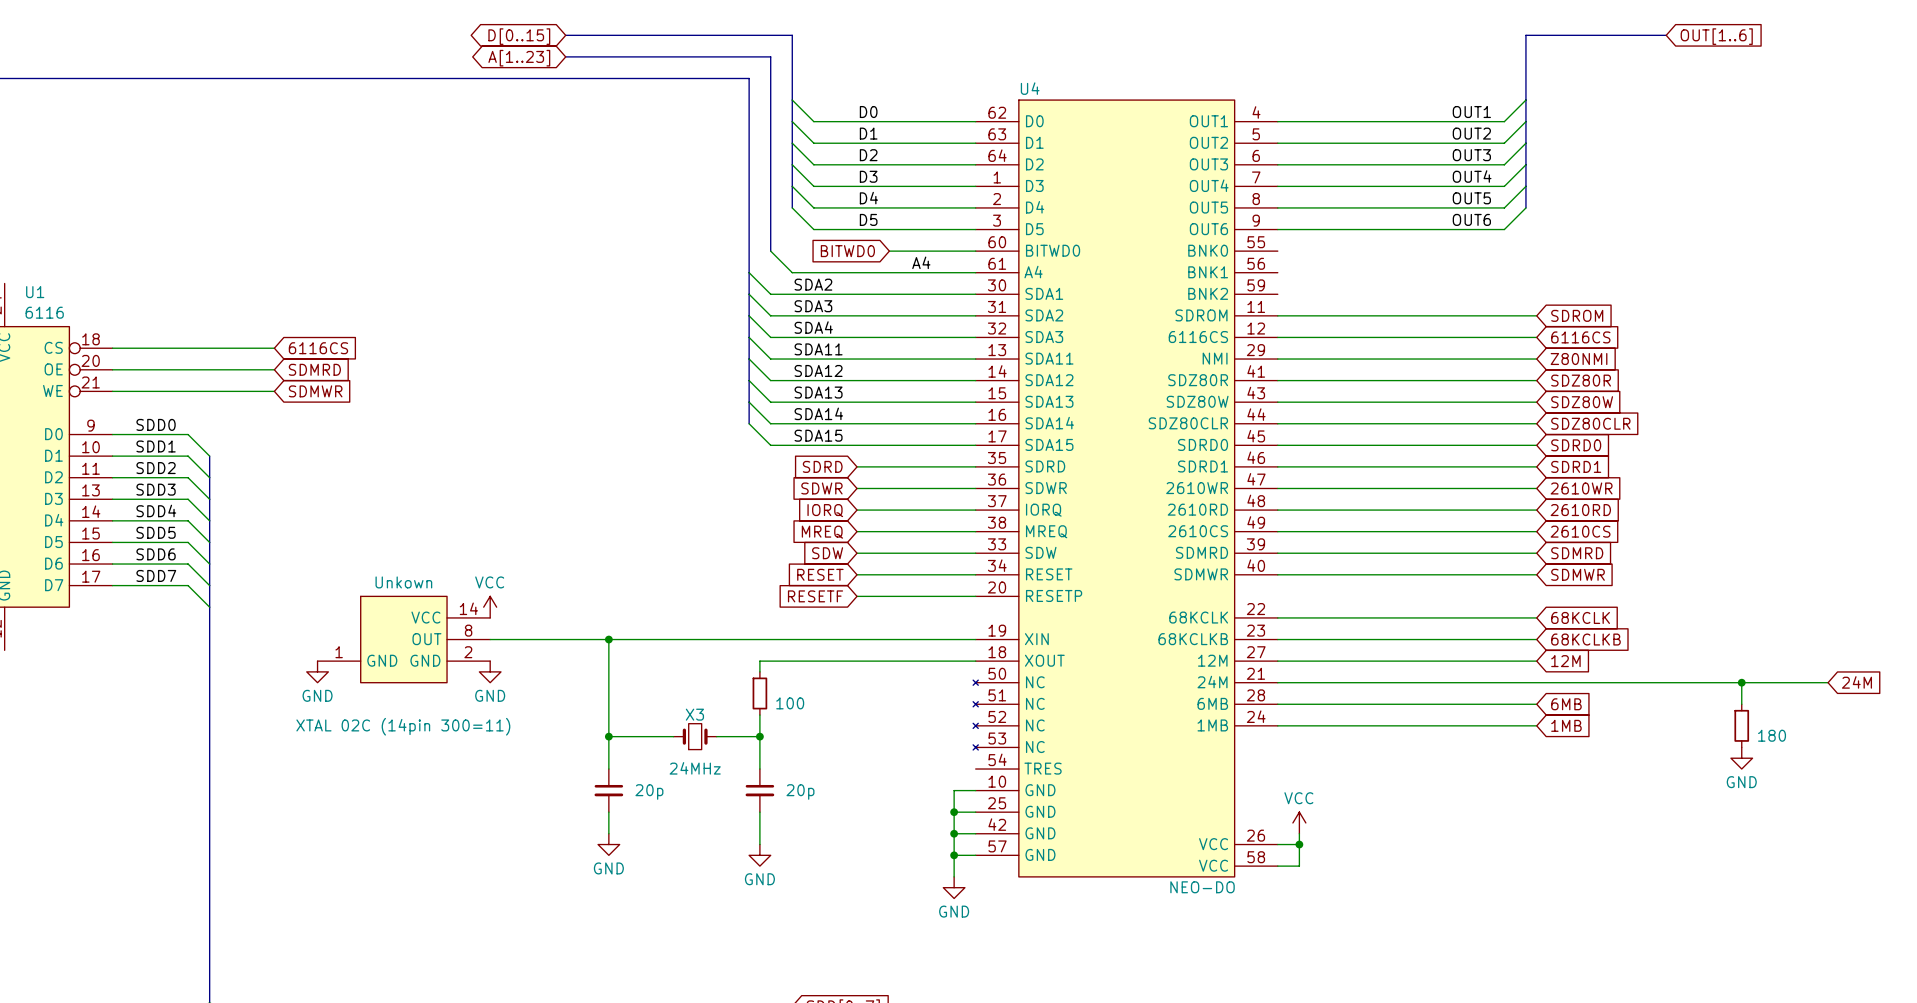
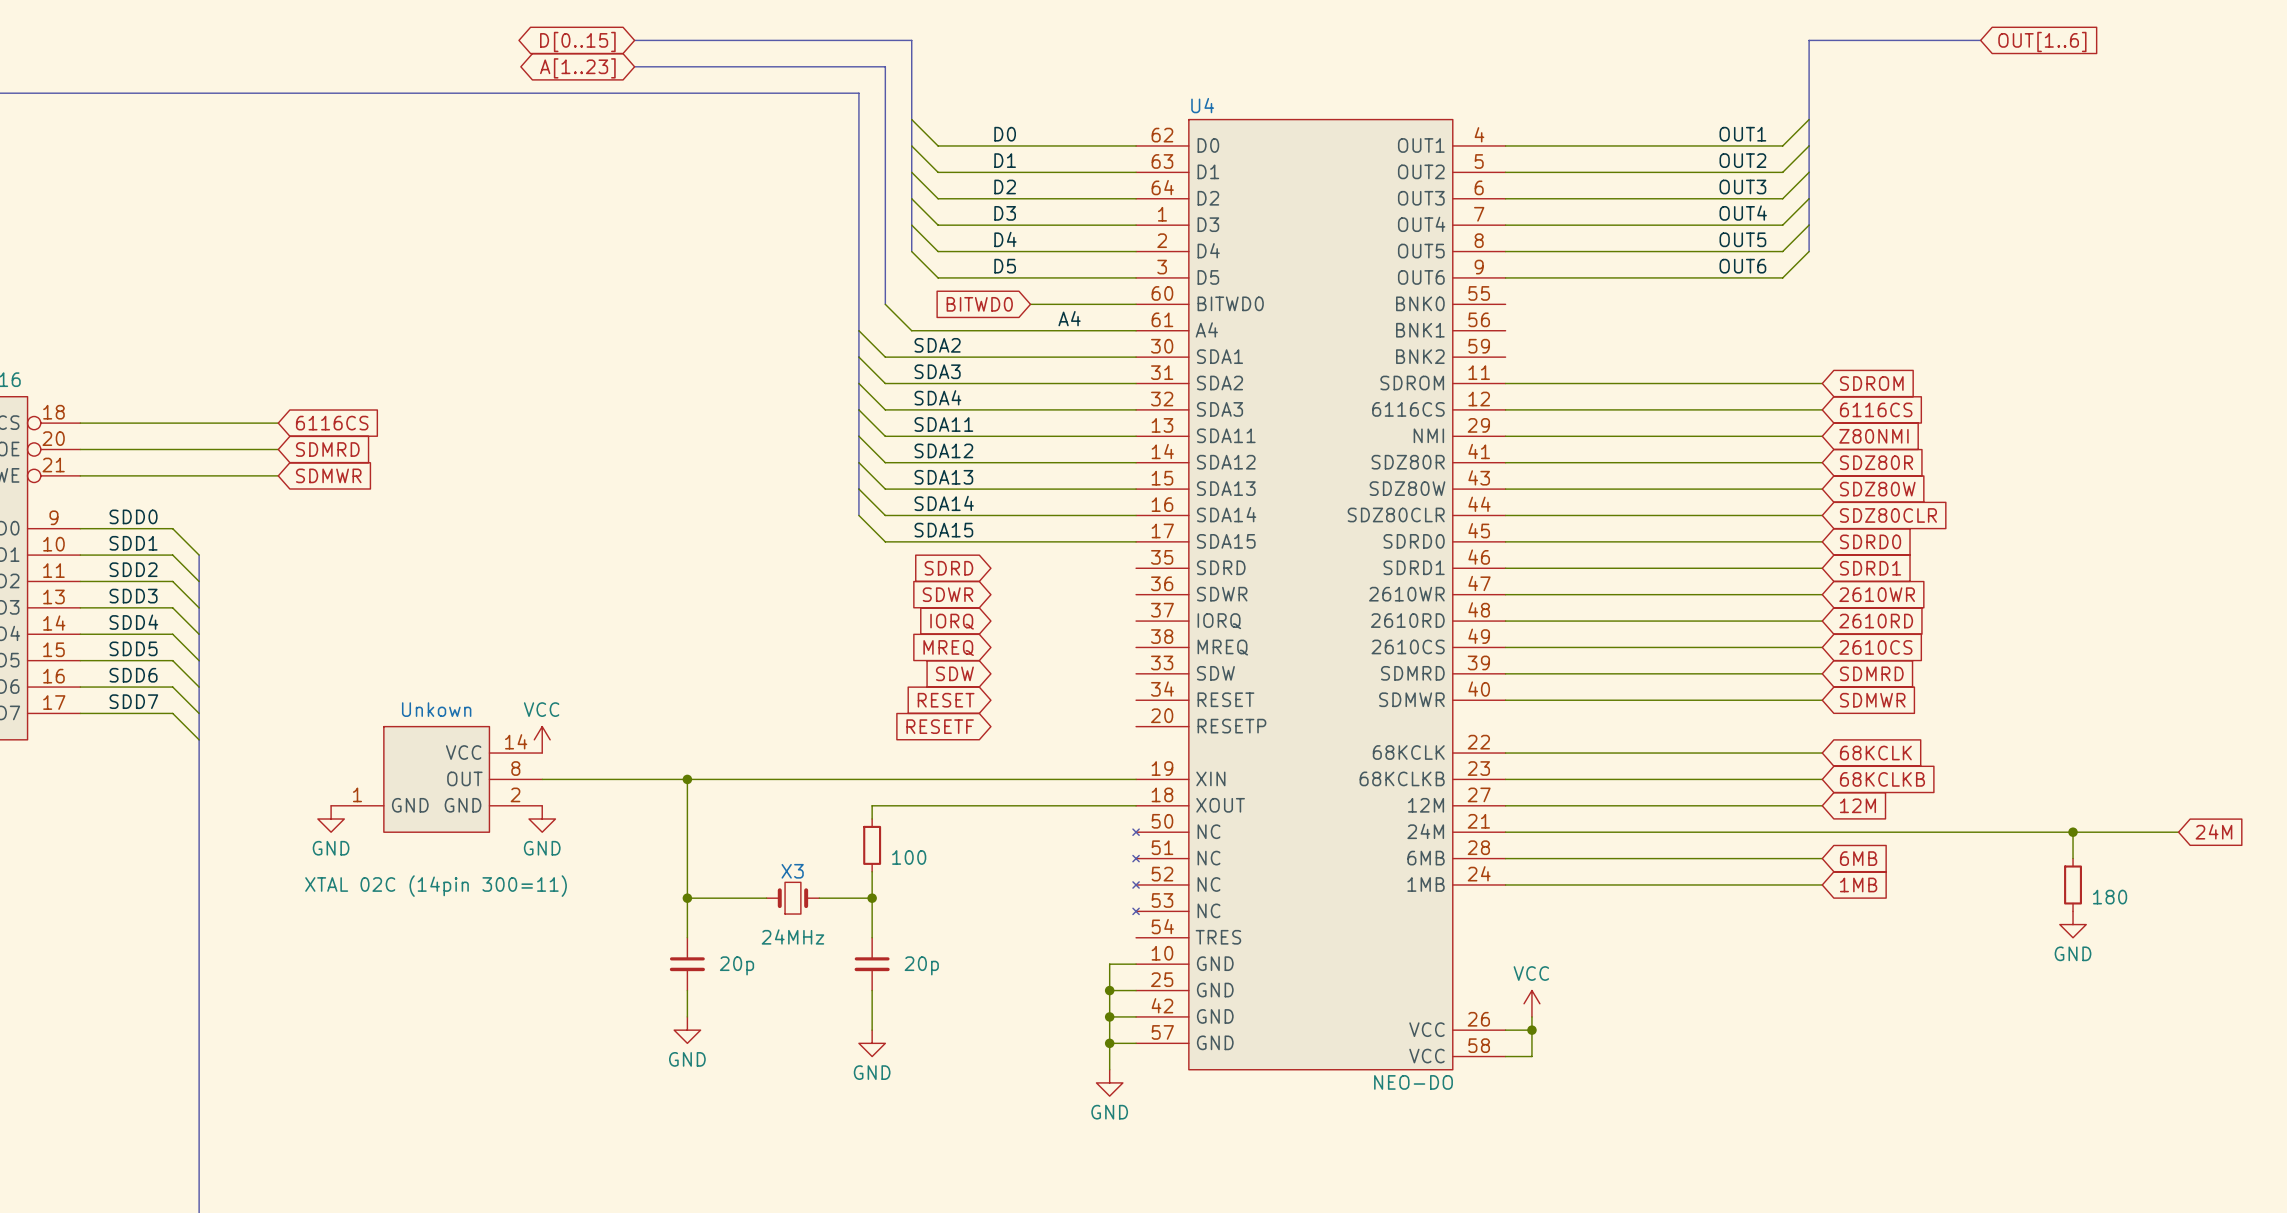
wire: (857, 466) (975, 466) -> none
wire: (857, 488) (975, 488) -> none
wire: (857, 510) (975, 510) -> none
wire: (857, 531) (975, 531) -> none
wire: (857, 553) (975, 553) -> none
wire: (857, 574) (975, 574) -> none
wire: (857, 596) (975, 596) -> none

